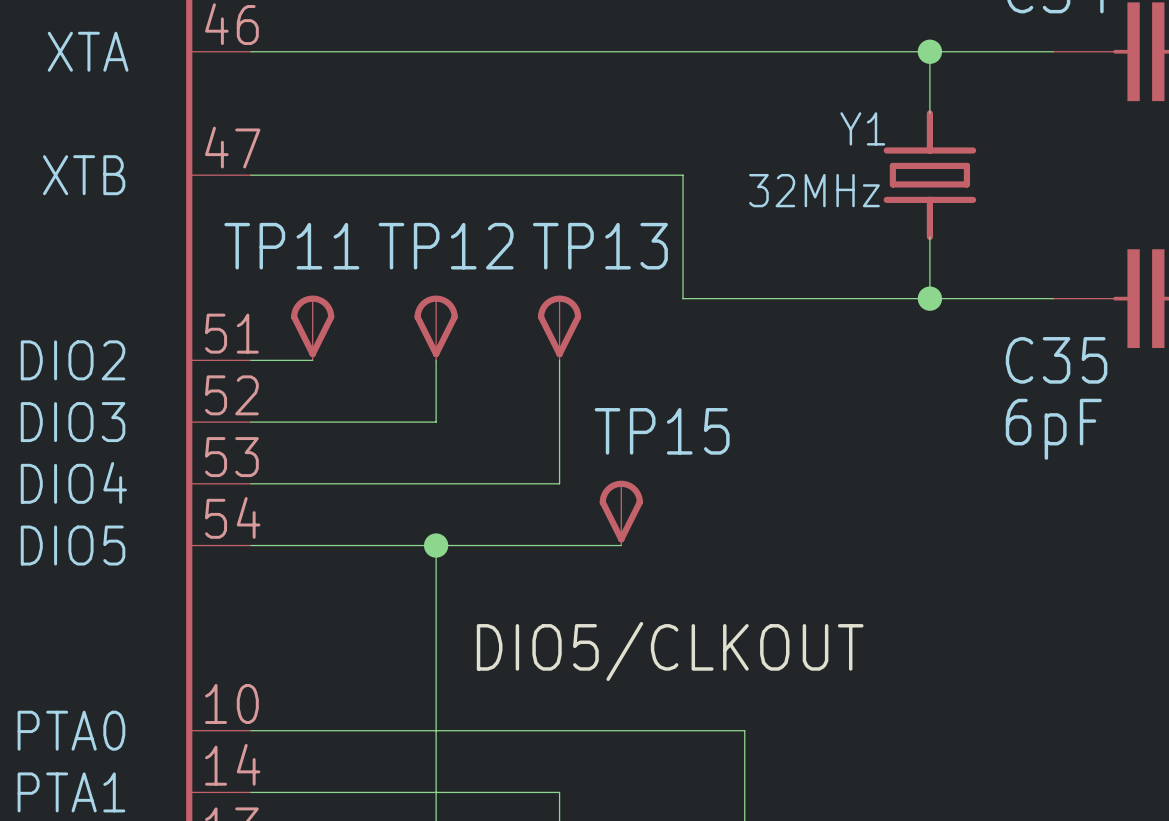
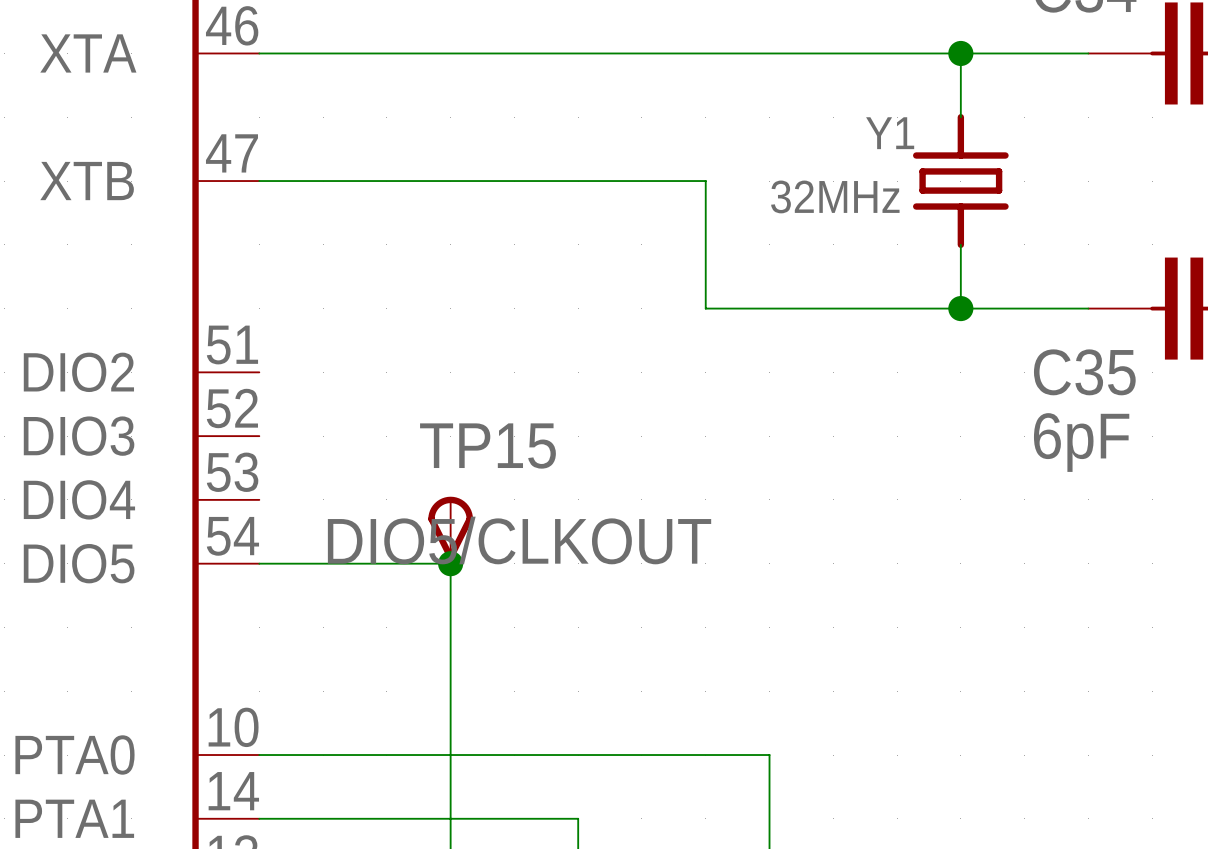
TP11: (312, 327) -> none
TP12: (436, 327) -> none
TP13: (559, 327) -> none
wire: (250, 360) (312, 360) -> none
wire: (436, 360) (436, 422) (250, 422) -> none
wire: (559, 360) (559, 483) (250, 483) -> none
TP15 position: (621, 513) -> (450, 530)
wire: (436, 545) (621, 545) -> none
label position: DIO5/CLKOUT (670, 651) -> DIO5/CLKOUT (519, 540)

